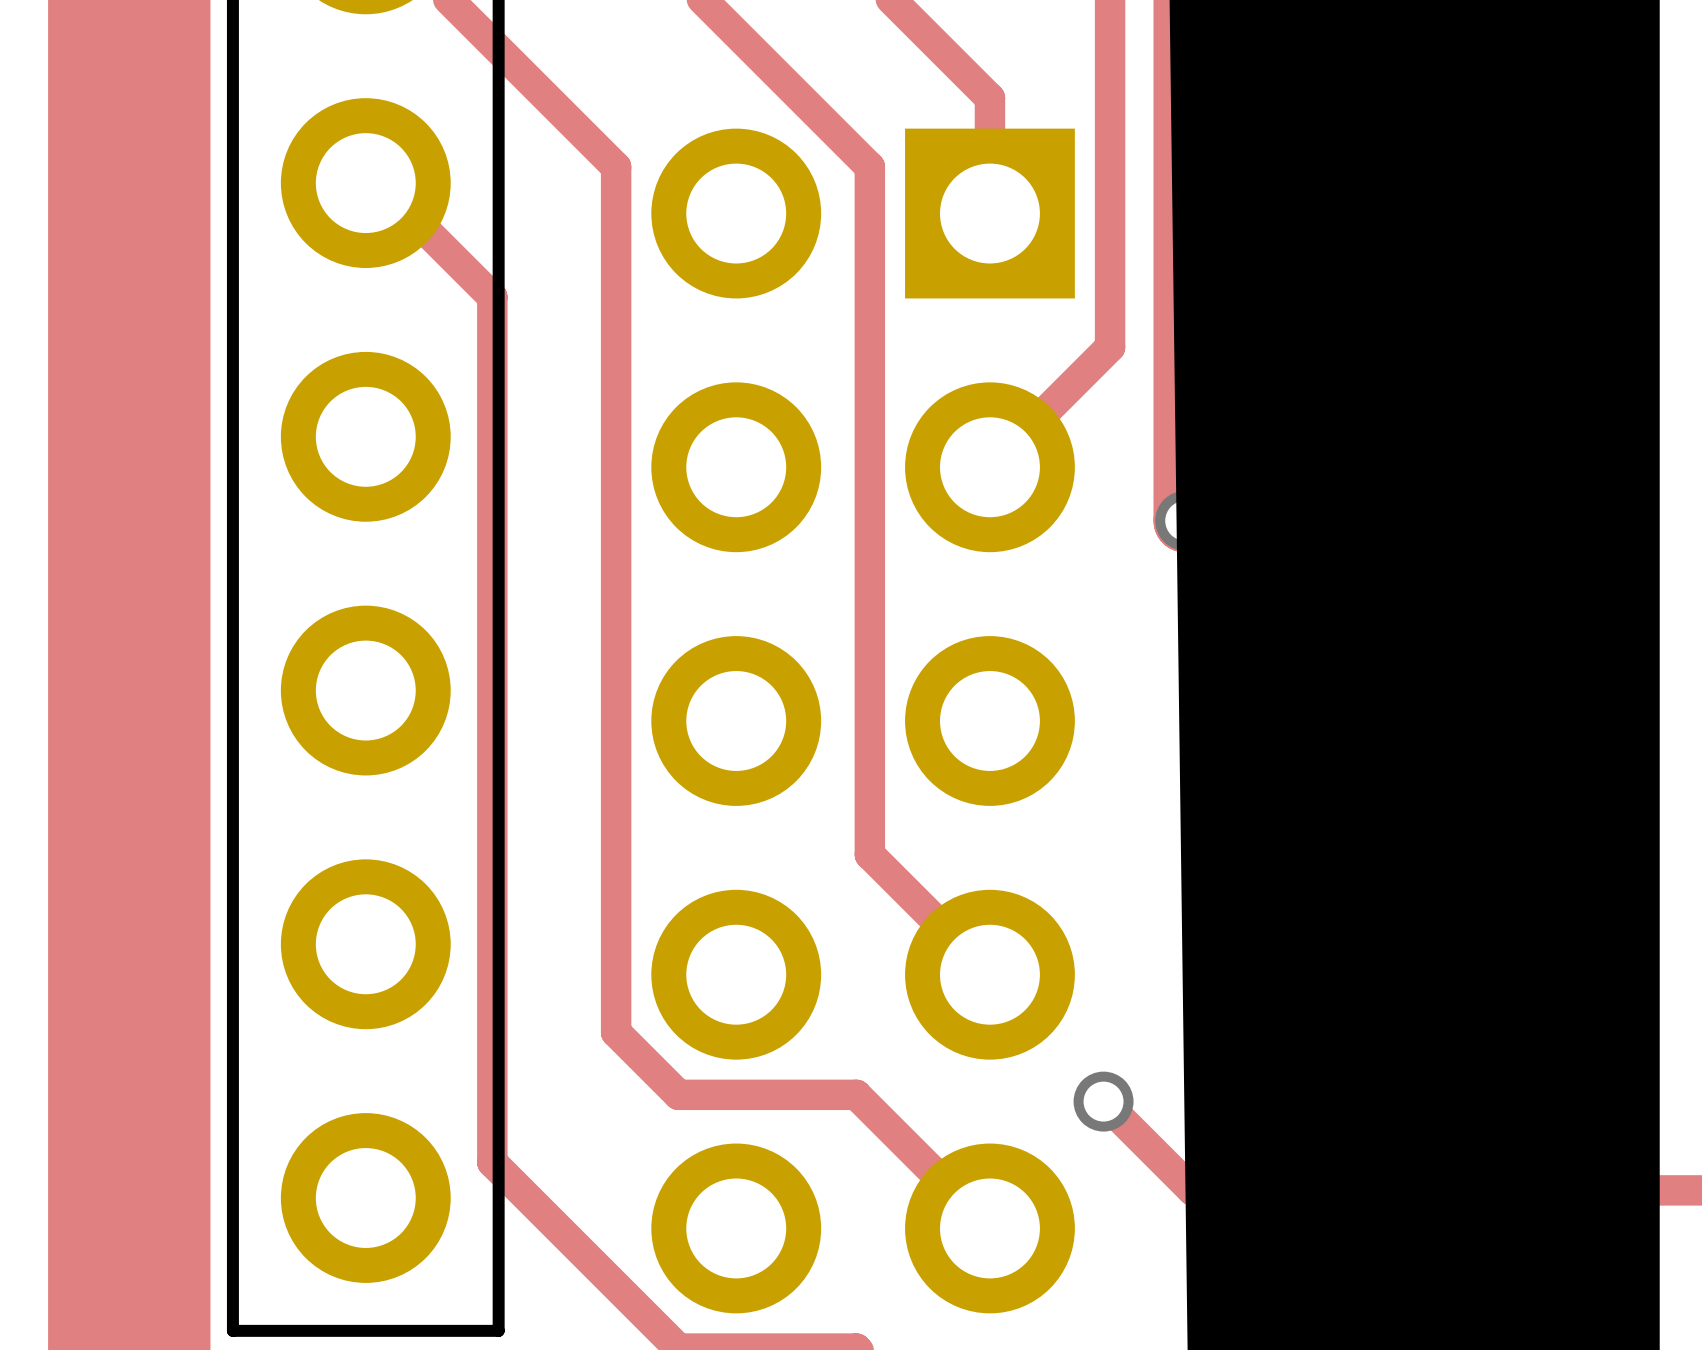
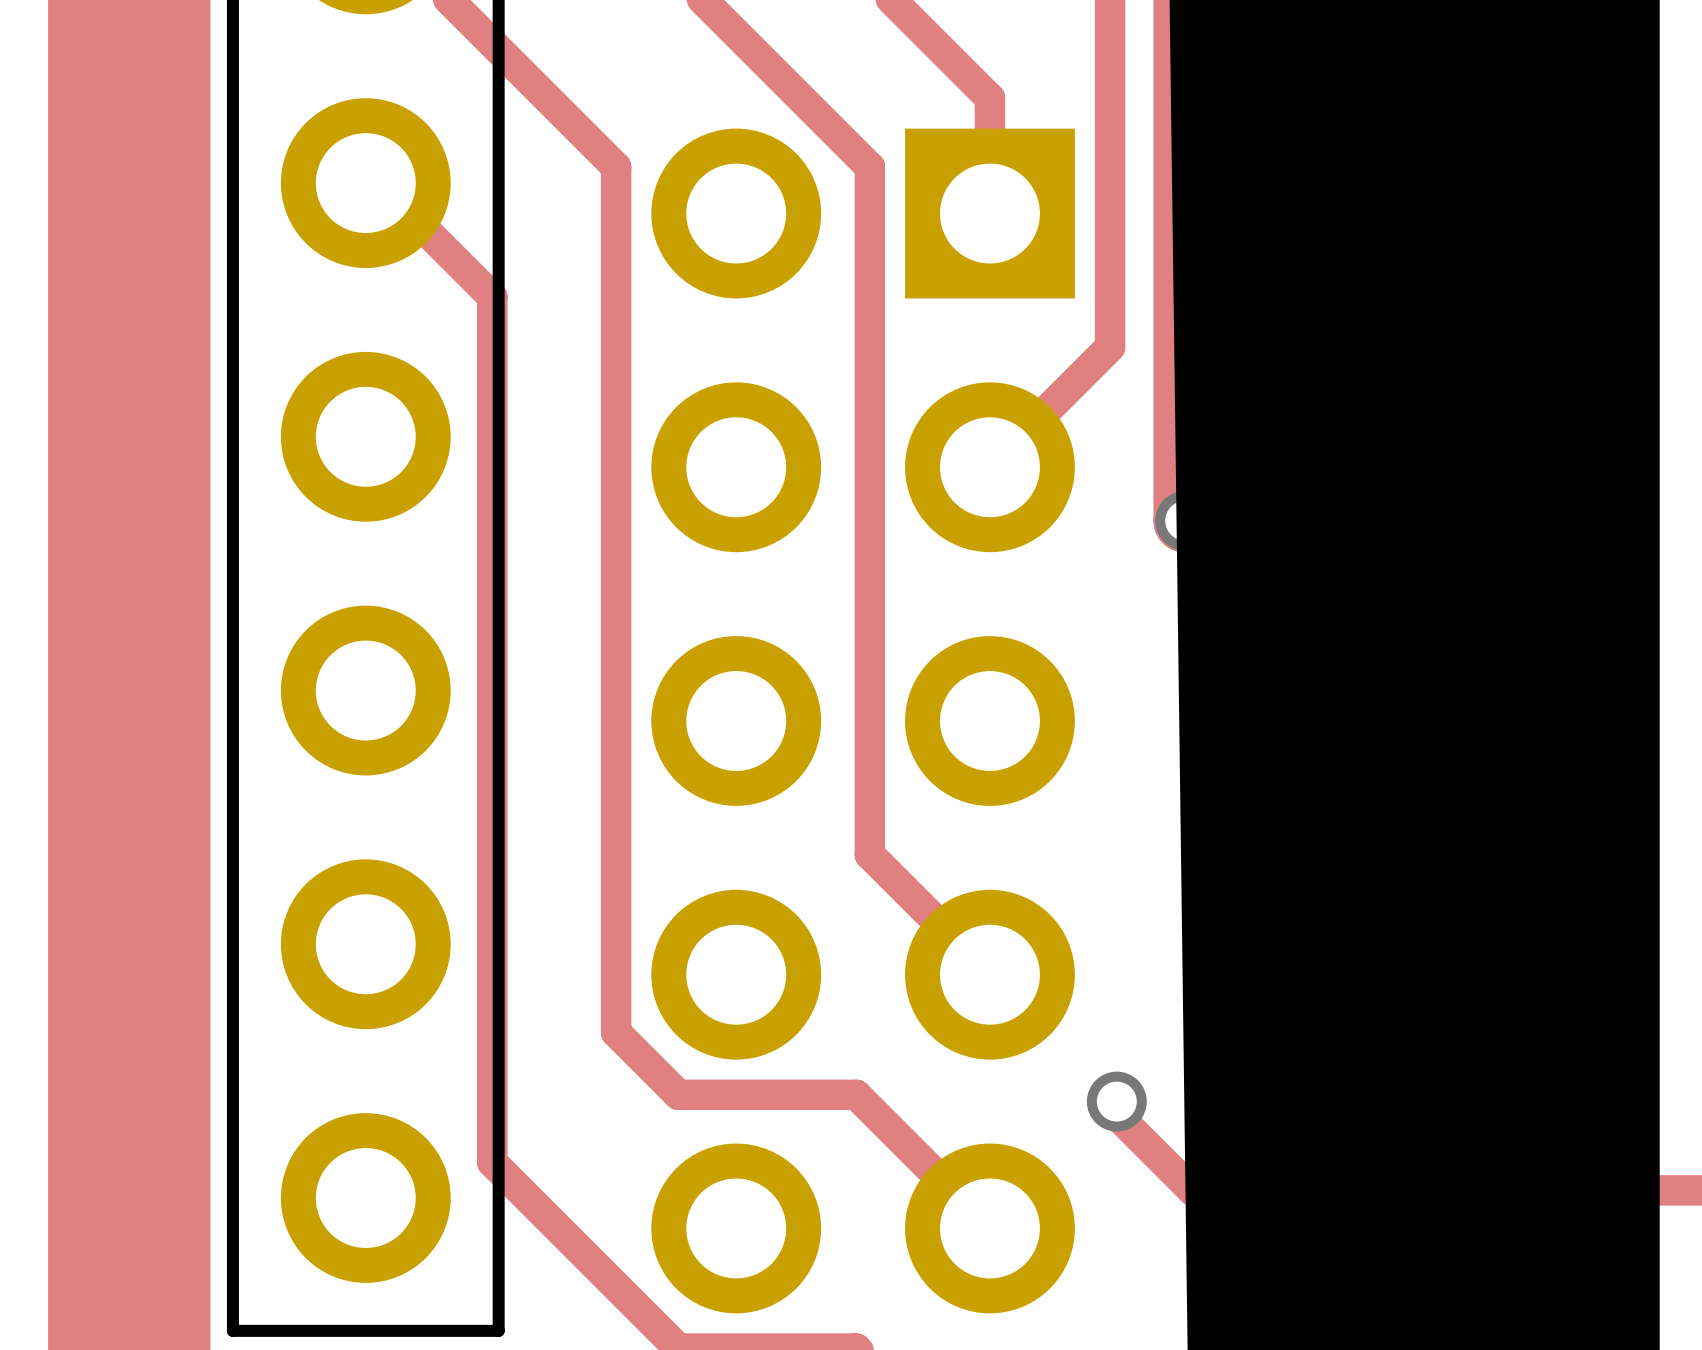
via position: (1103, 1101) -> (1116, 1101)

